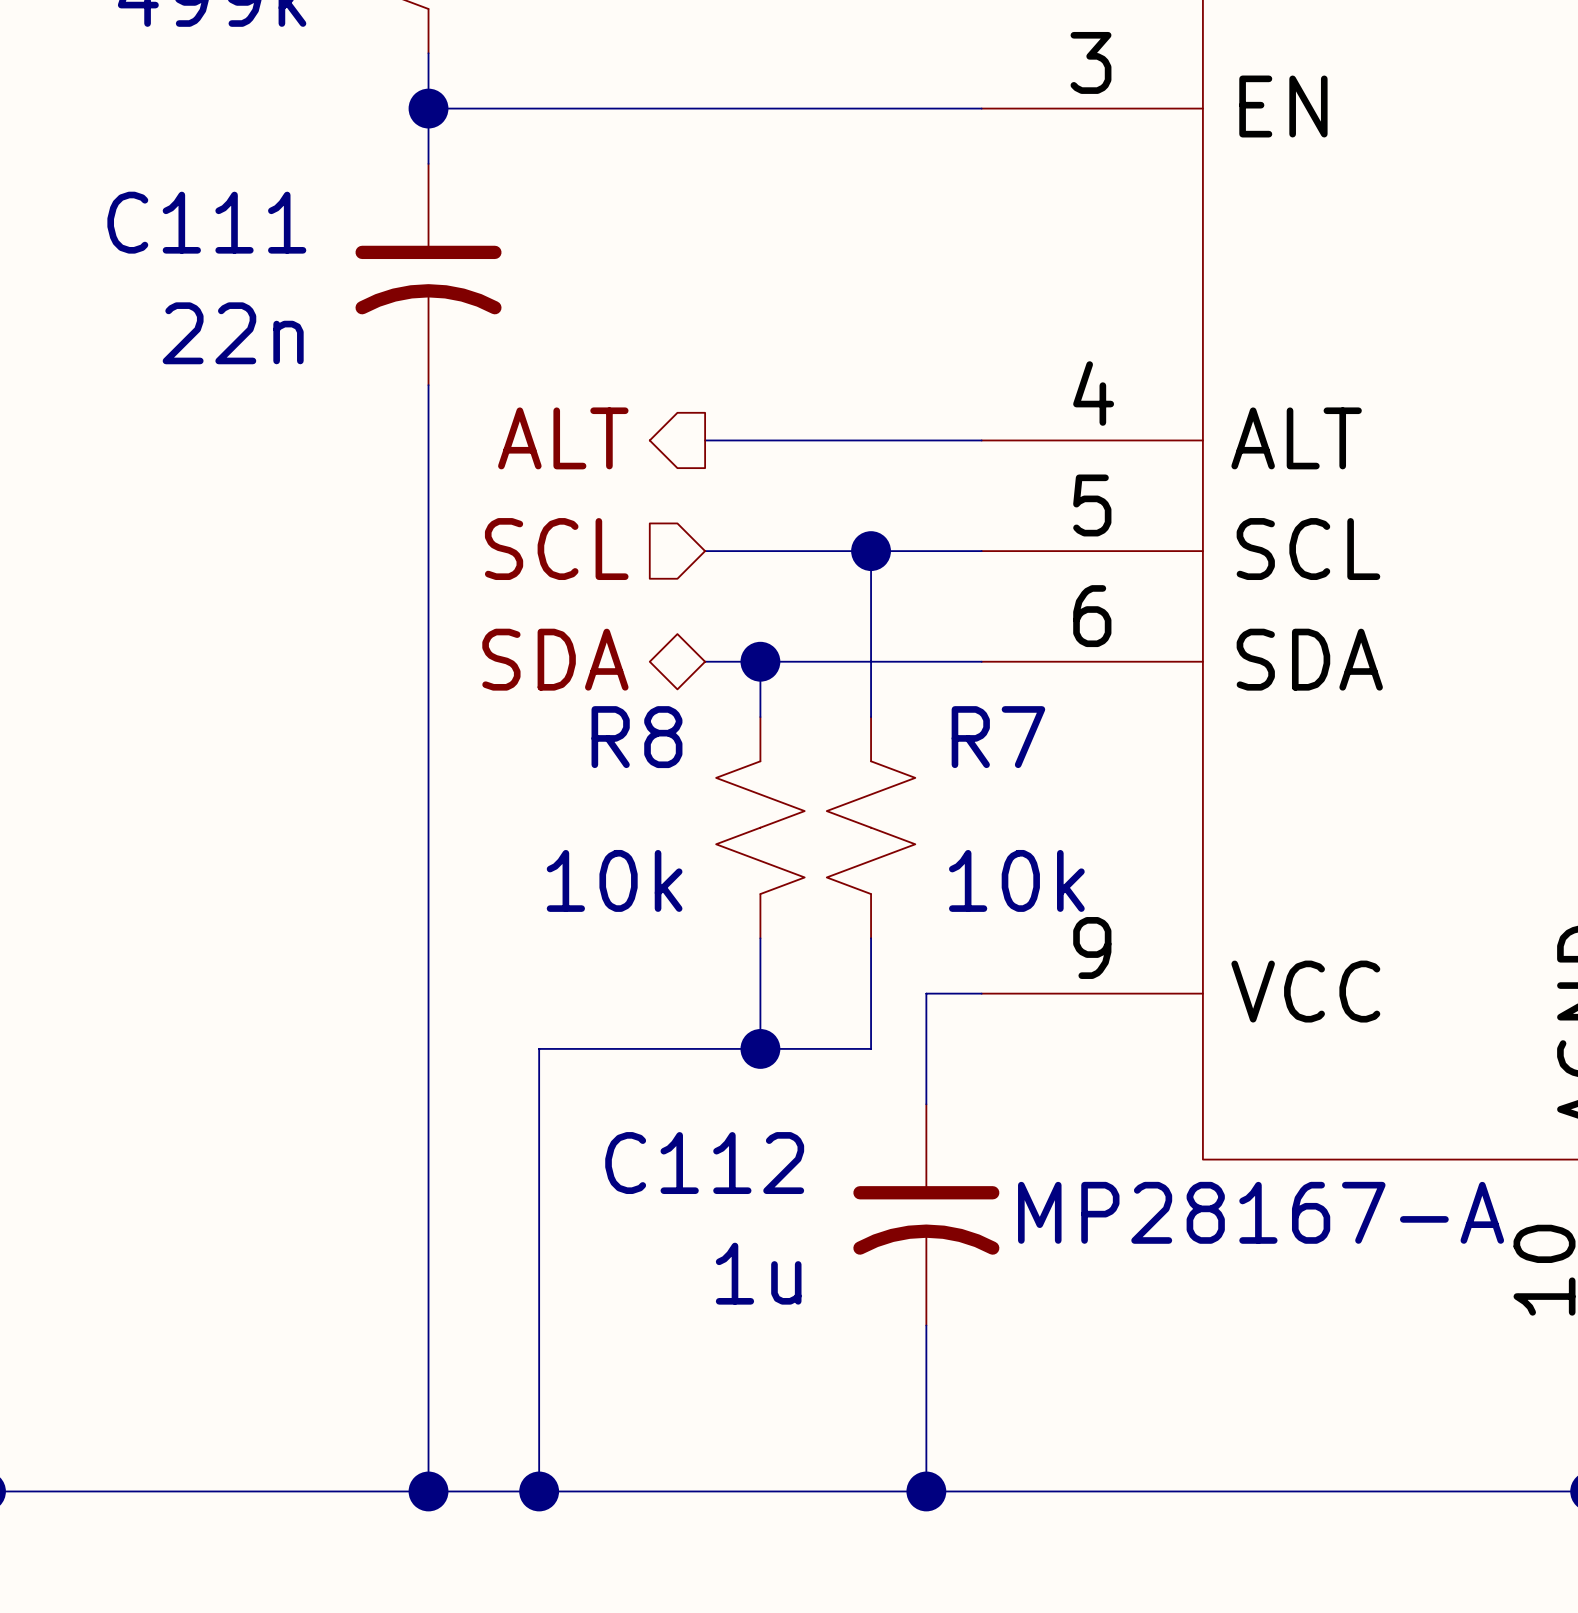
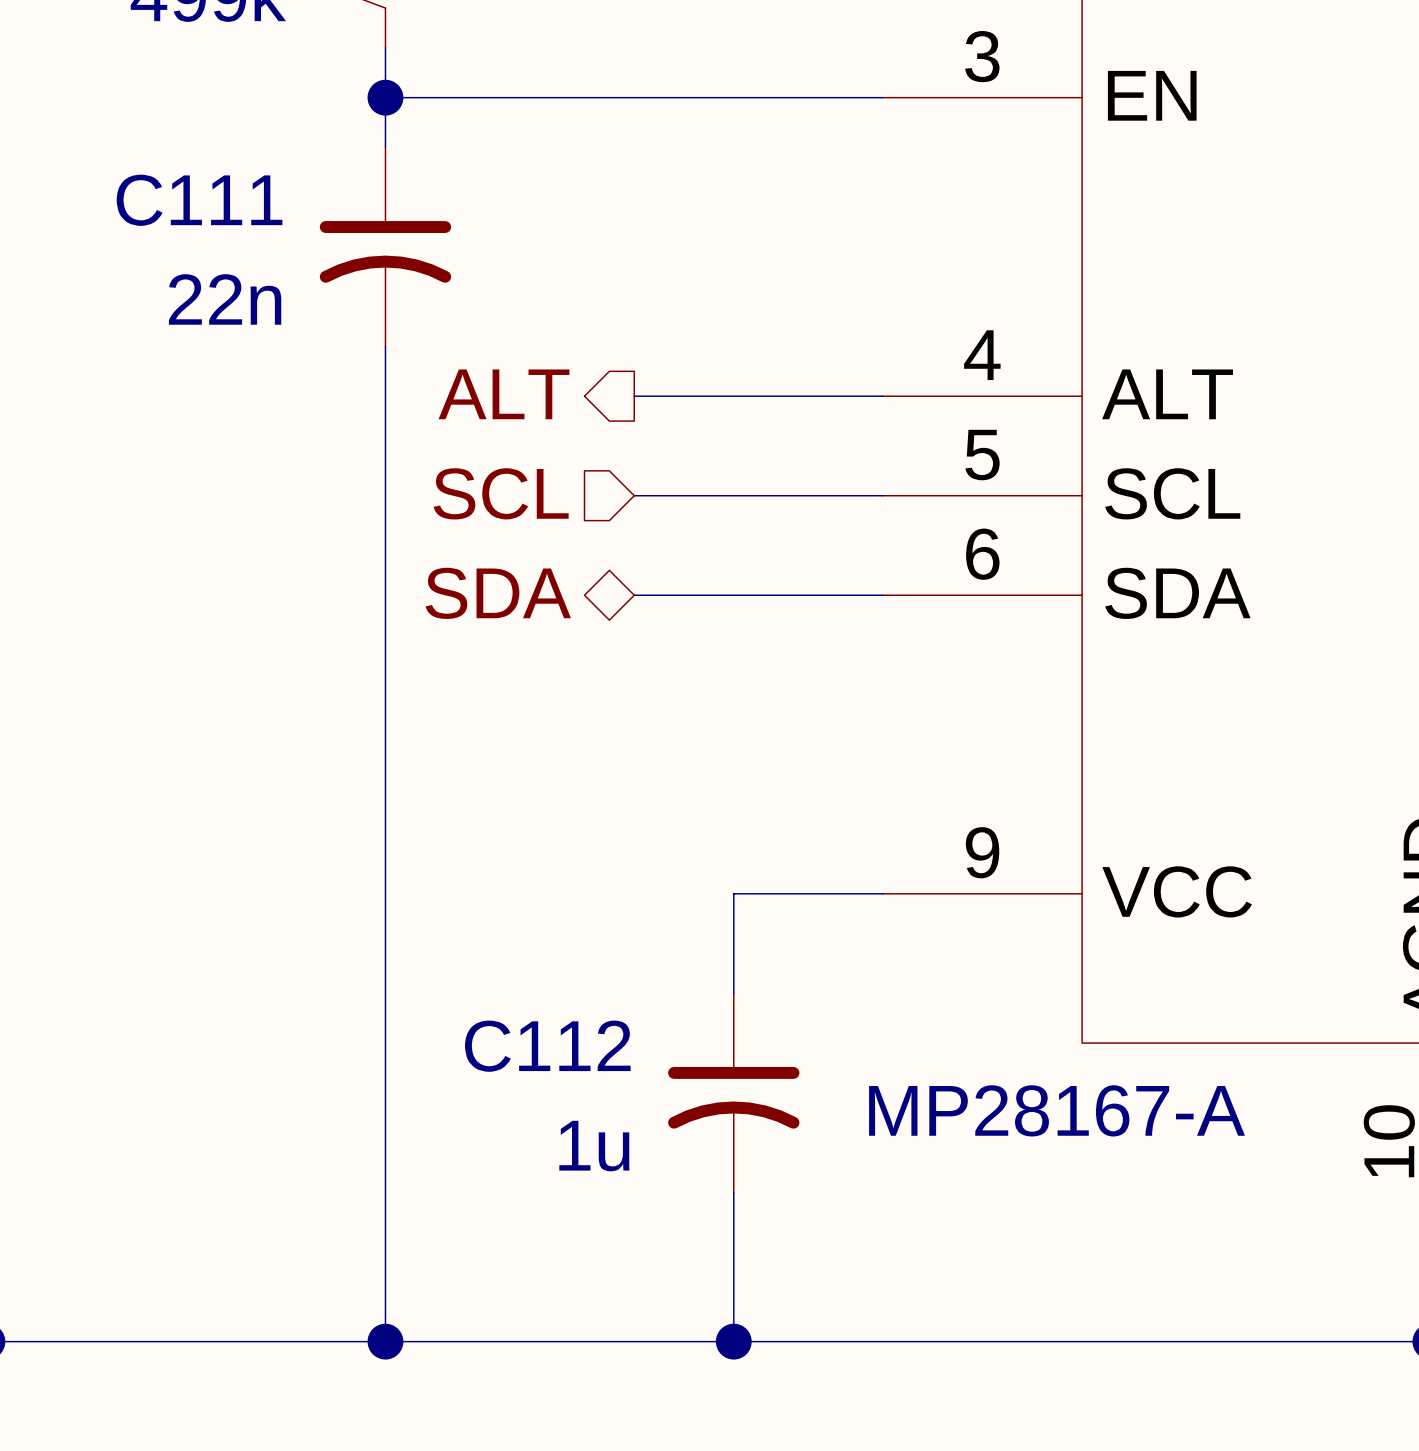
wire: (871, 551) (871, 717) -> none
junction: (871, 551) -> none
wire: (760, 661) (760, 717) -> none
junction: (760, 661) -> none
R8: 10k (760, 827) -> none
R7: 10k (871, 827) -> none
wire: (760, 938) (760, 1048) -> none
wire: (871, 938) (871, 1048) (539, 1048) (539, 1491) -> none
wire: (926, 993) (926, 1104) -> (833, 893) (733, 893) (733, 993)
junction: (760, 1048) -> none
part value position: MP28167-A (1261, 1212) -> MP28167-A (1057, 1110)
C112 position: (926, 1214) -> (733, 1092)
wire: (926, 1325) (926, 1491) -> (733, 1192) (733, 1341)
junction: (539, 1491) -> none
junction position: (926, 1491) -> (733, 1341)

